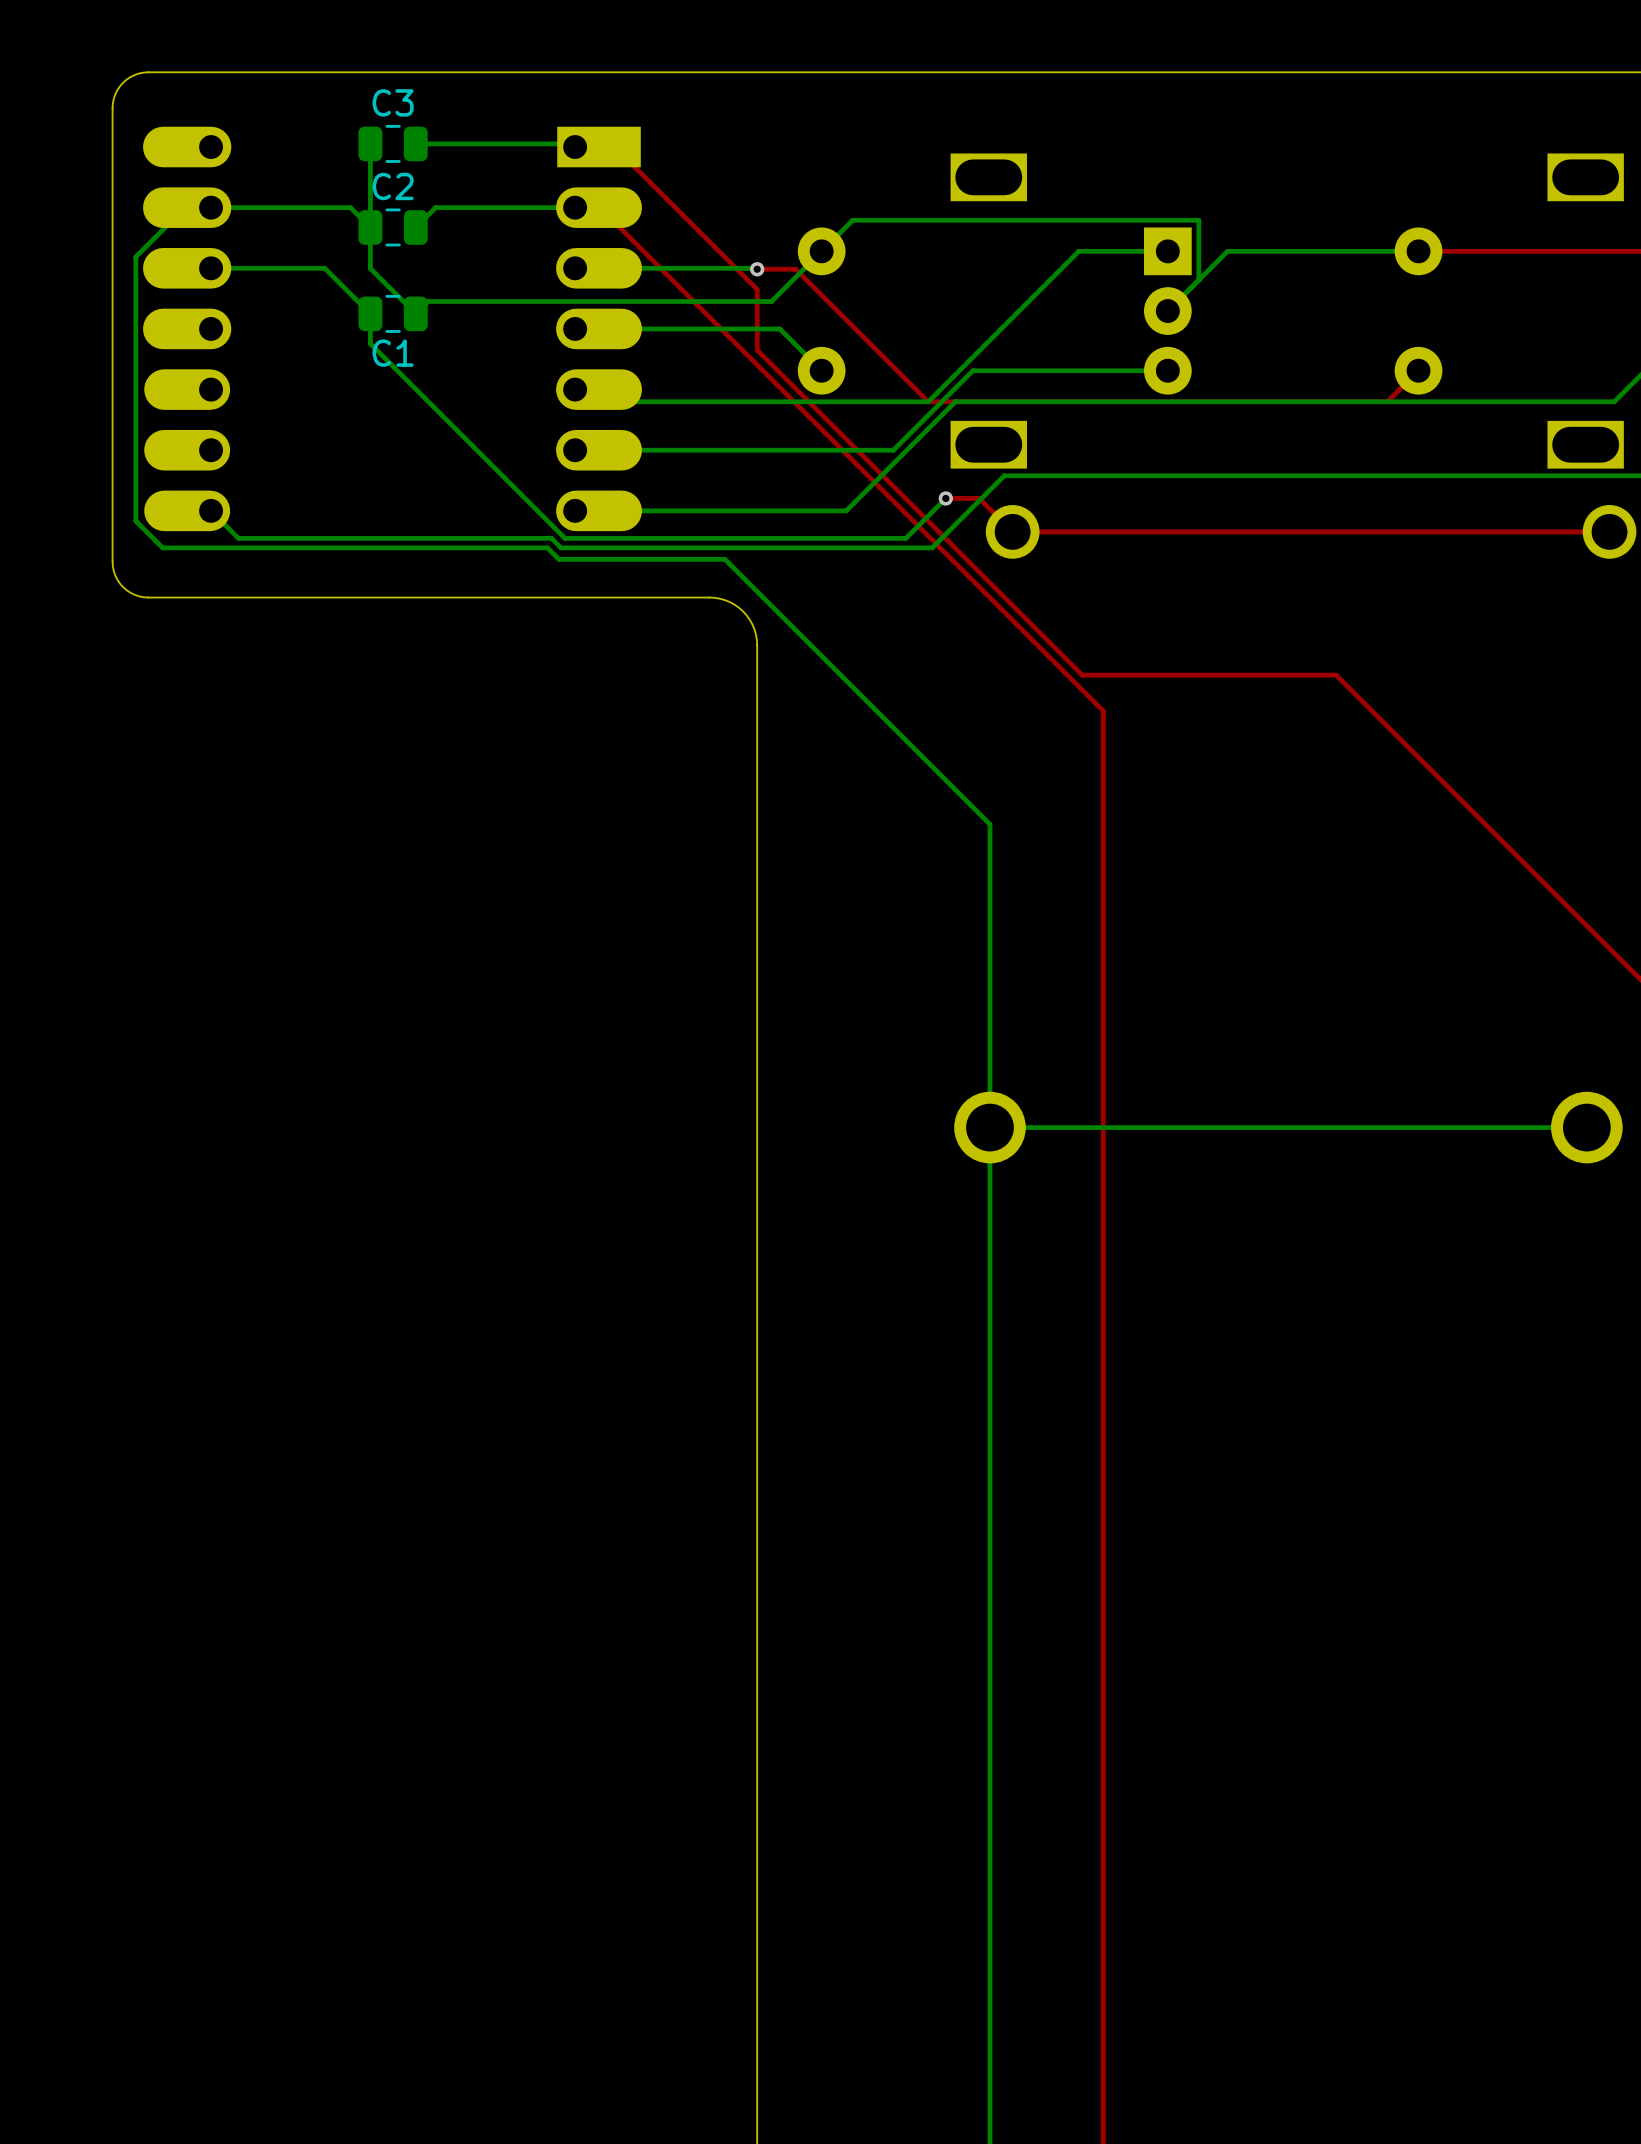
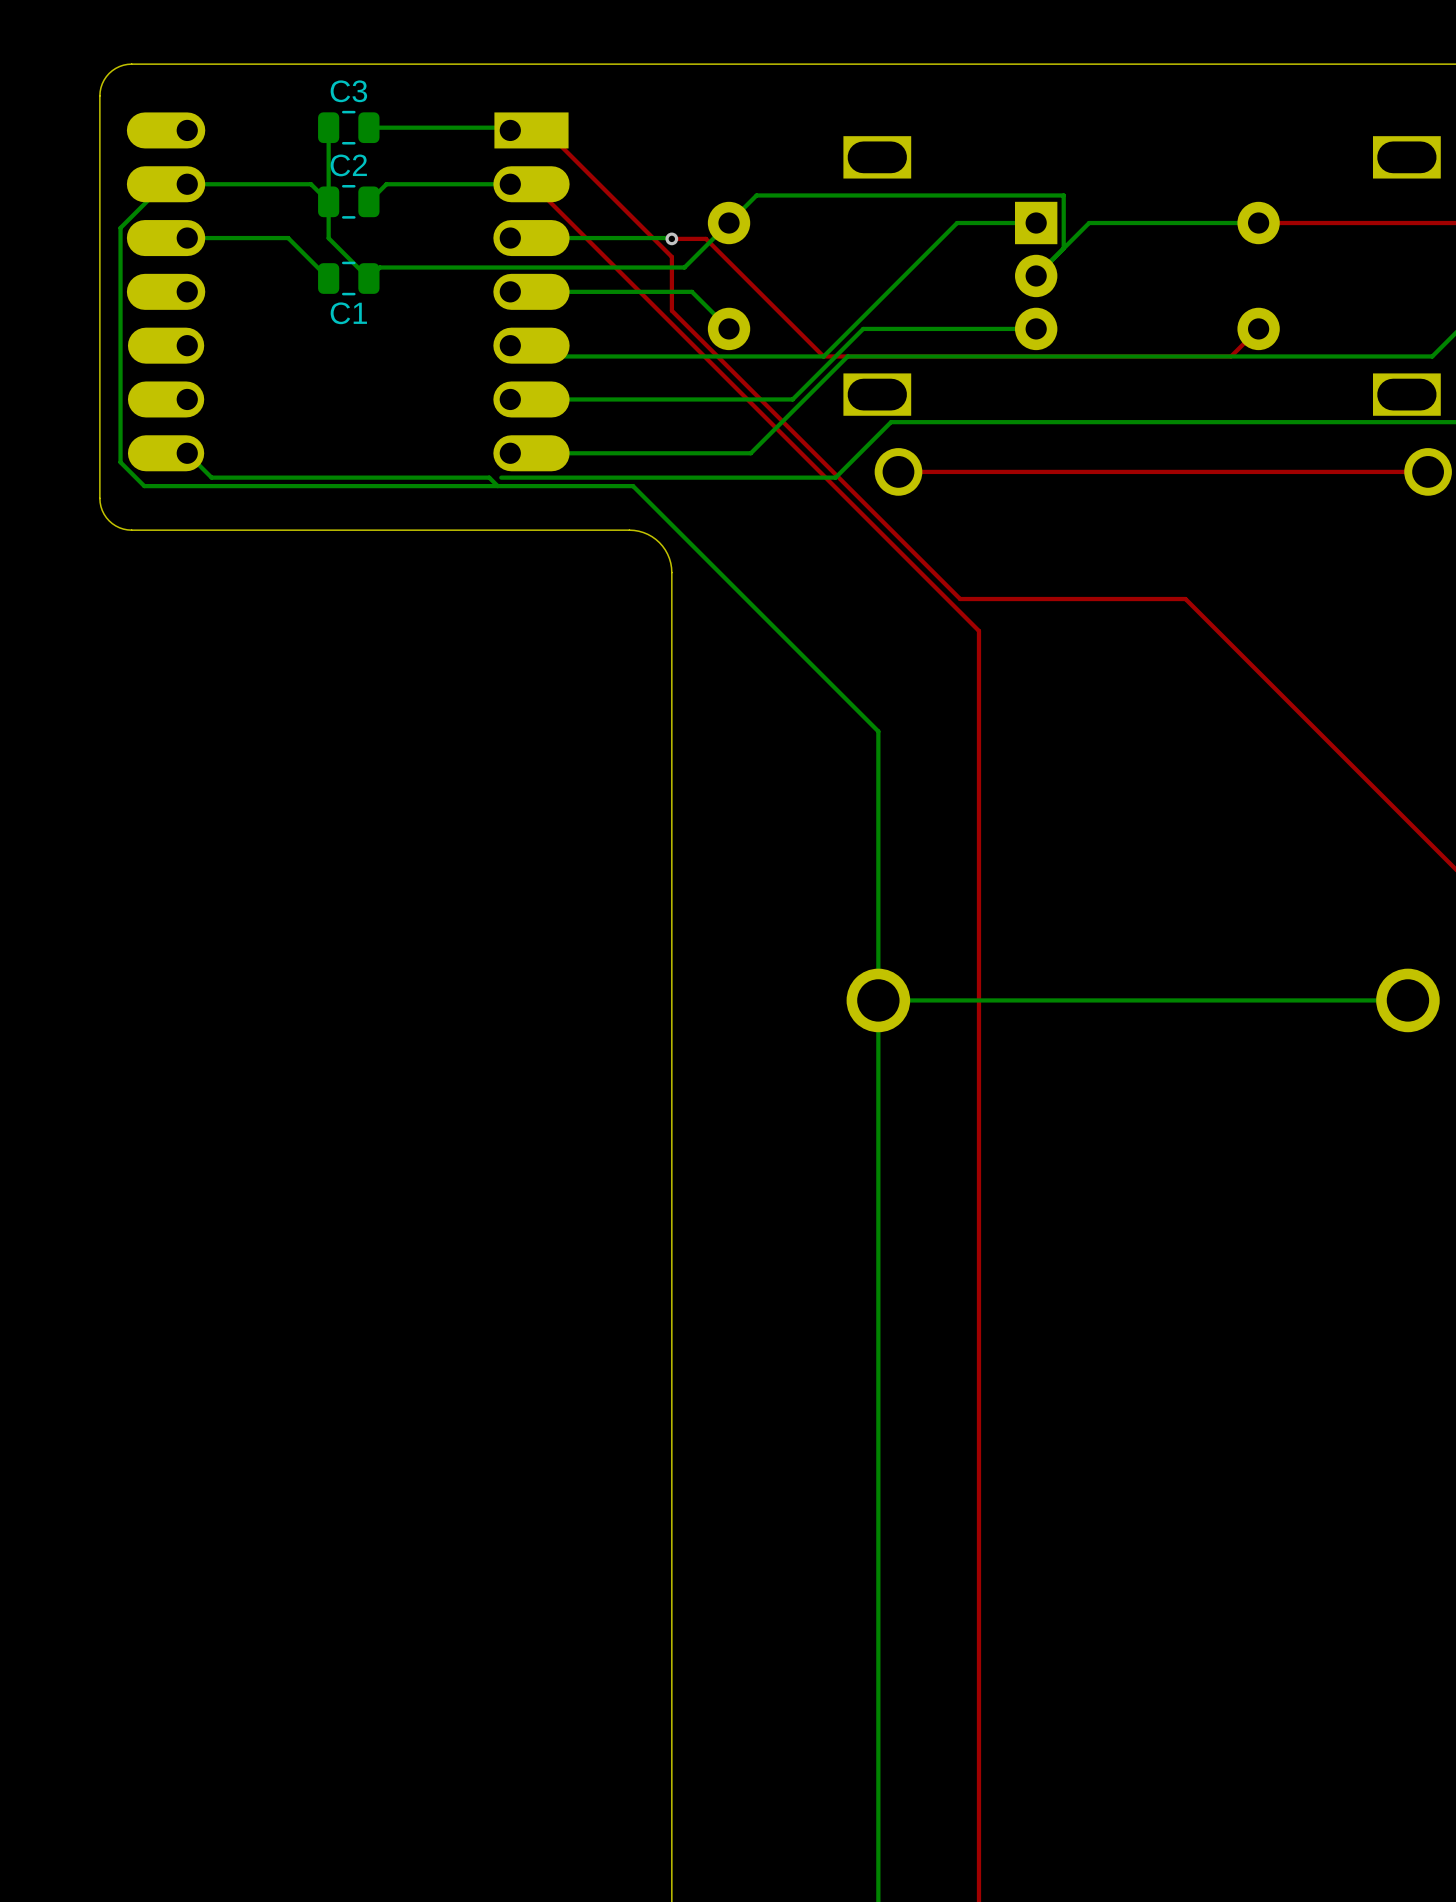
bottom track: (370, 313) (370, 343) (564, 538) -> none
bottom track: (947, 497) (905, 538) -> (835, 477) (803, 477)
top track: (945, 498) (979, 498) (1012, 531) -> none
via: (945, 498) -> none
bottom track: (941, 538) (932, 547) (713, 547) -> (643, 496) (633, 486)
bottom track: (547, 547) (558, 559) (724, 559) -> (485, 486) (497, 486)

